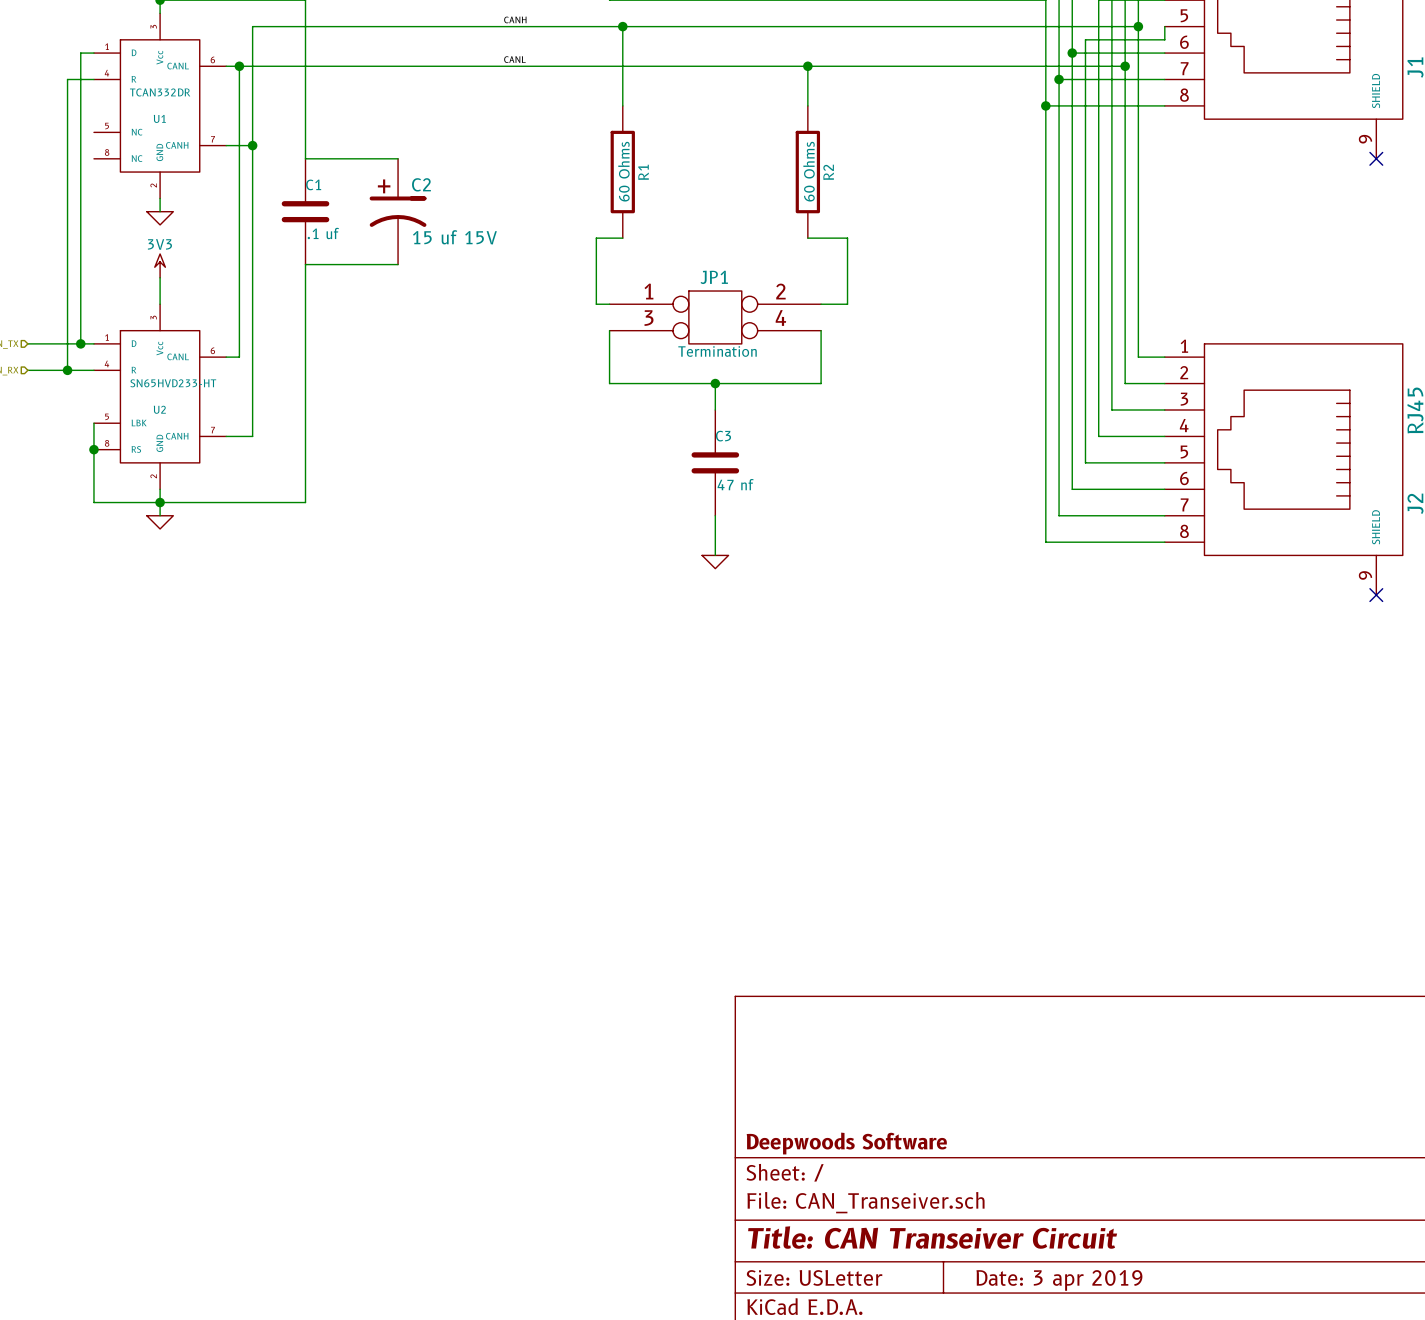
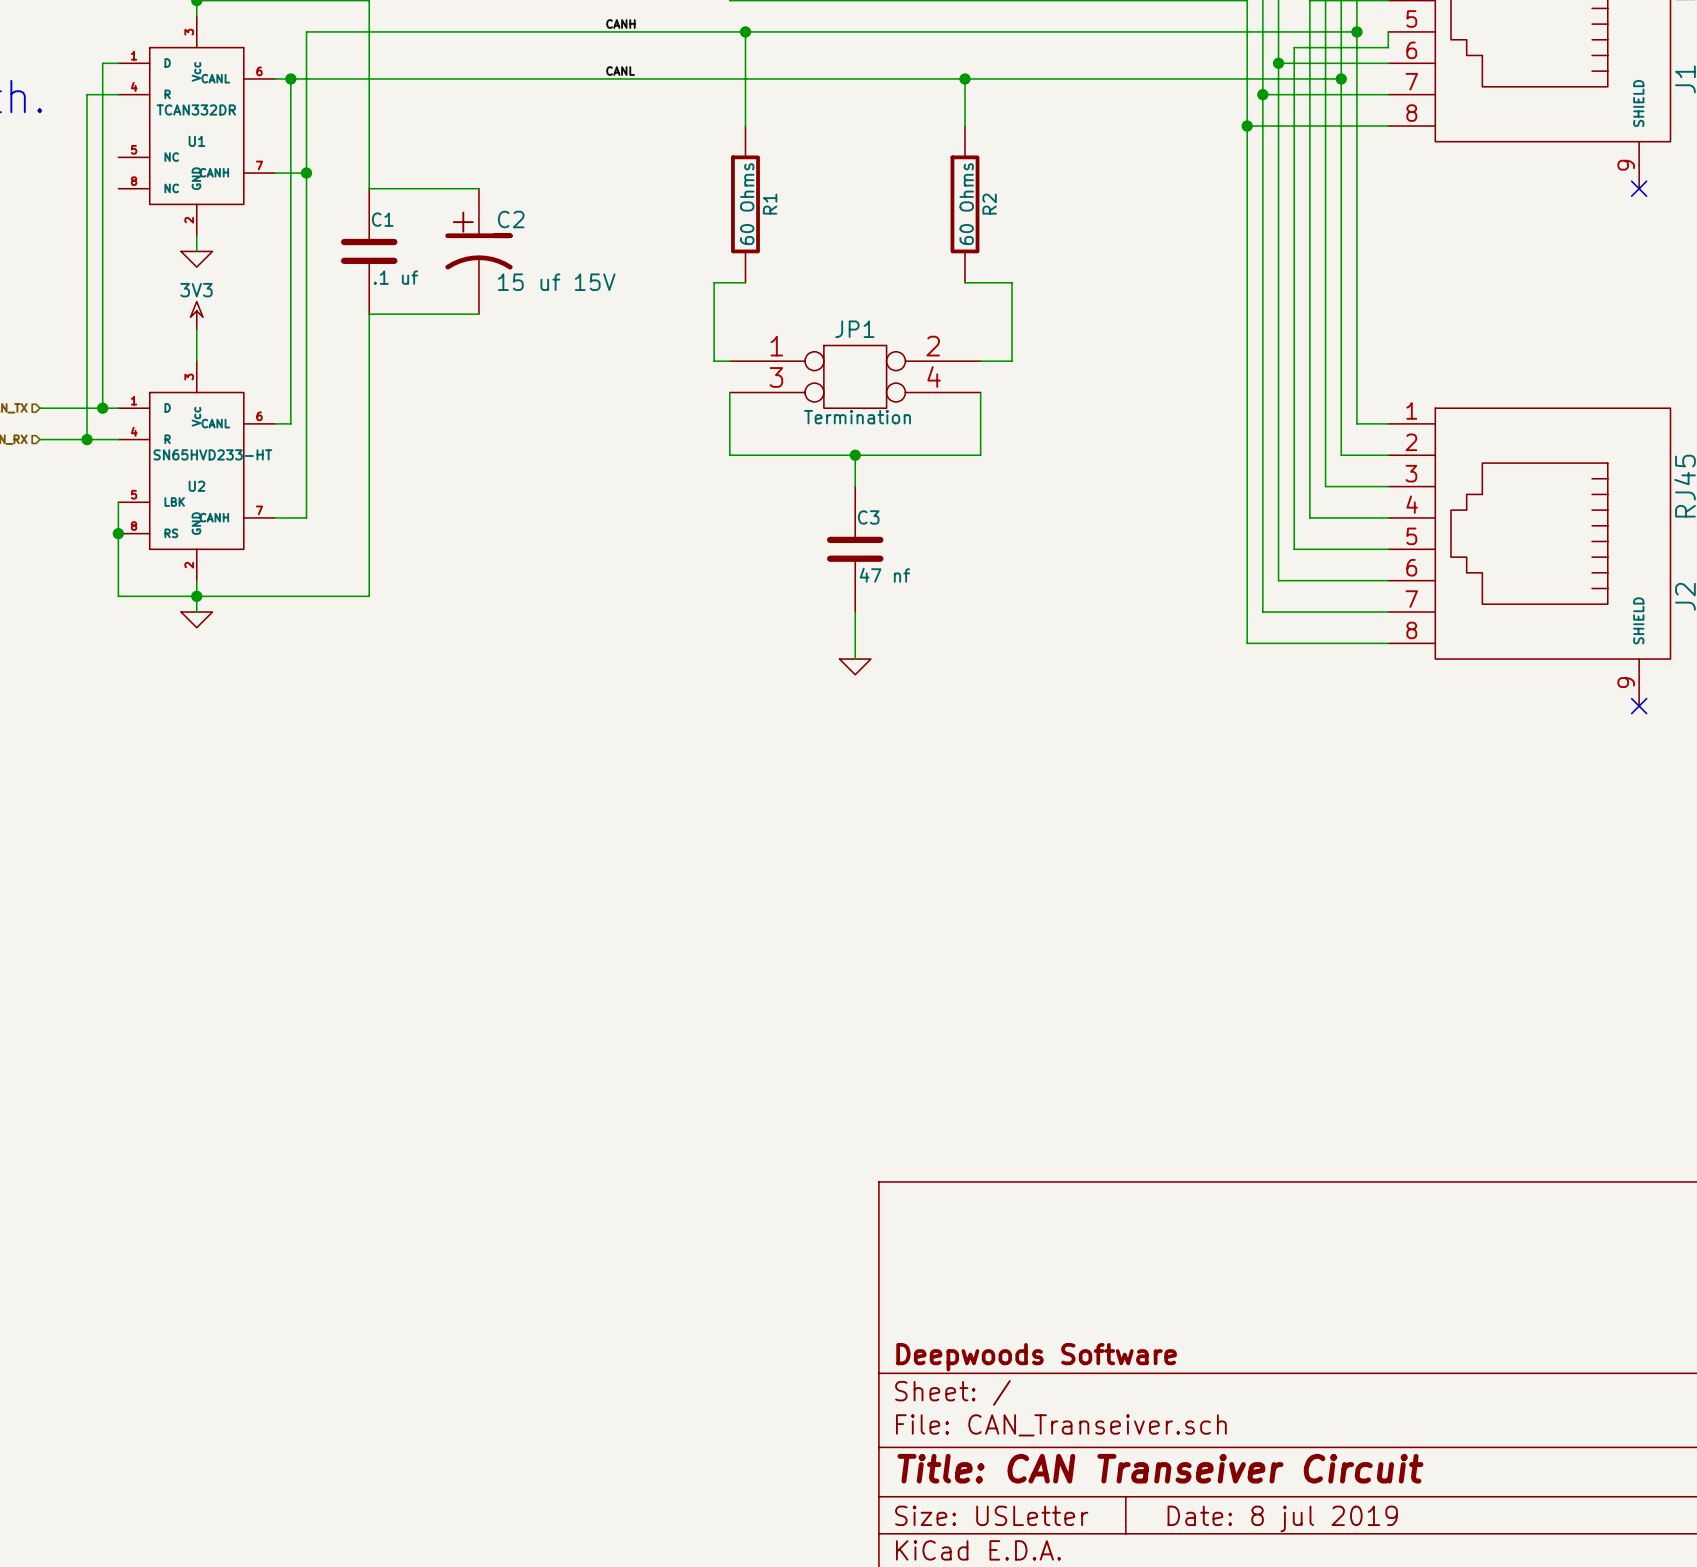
title block: Date: 3 apr 2019 (1059, 1280) -> Date: 8 jul 2019 (1282, 1518)

